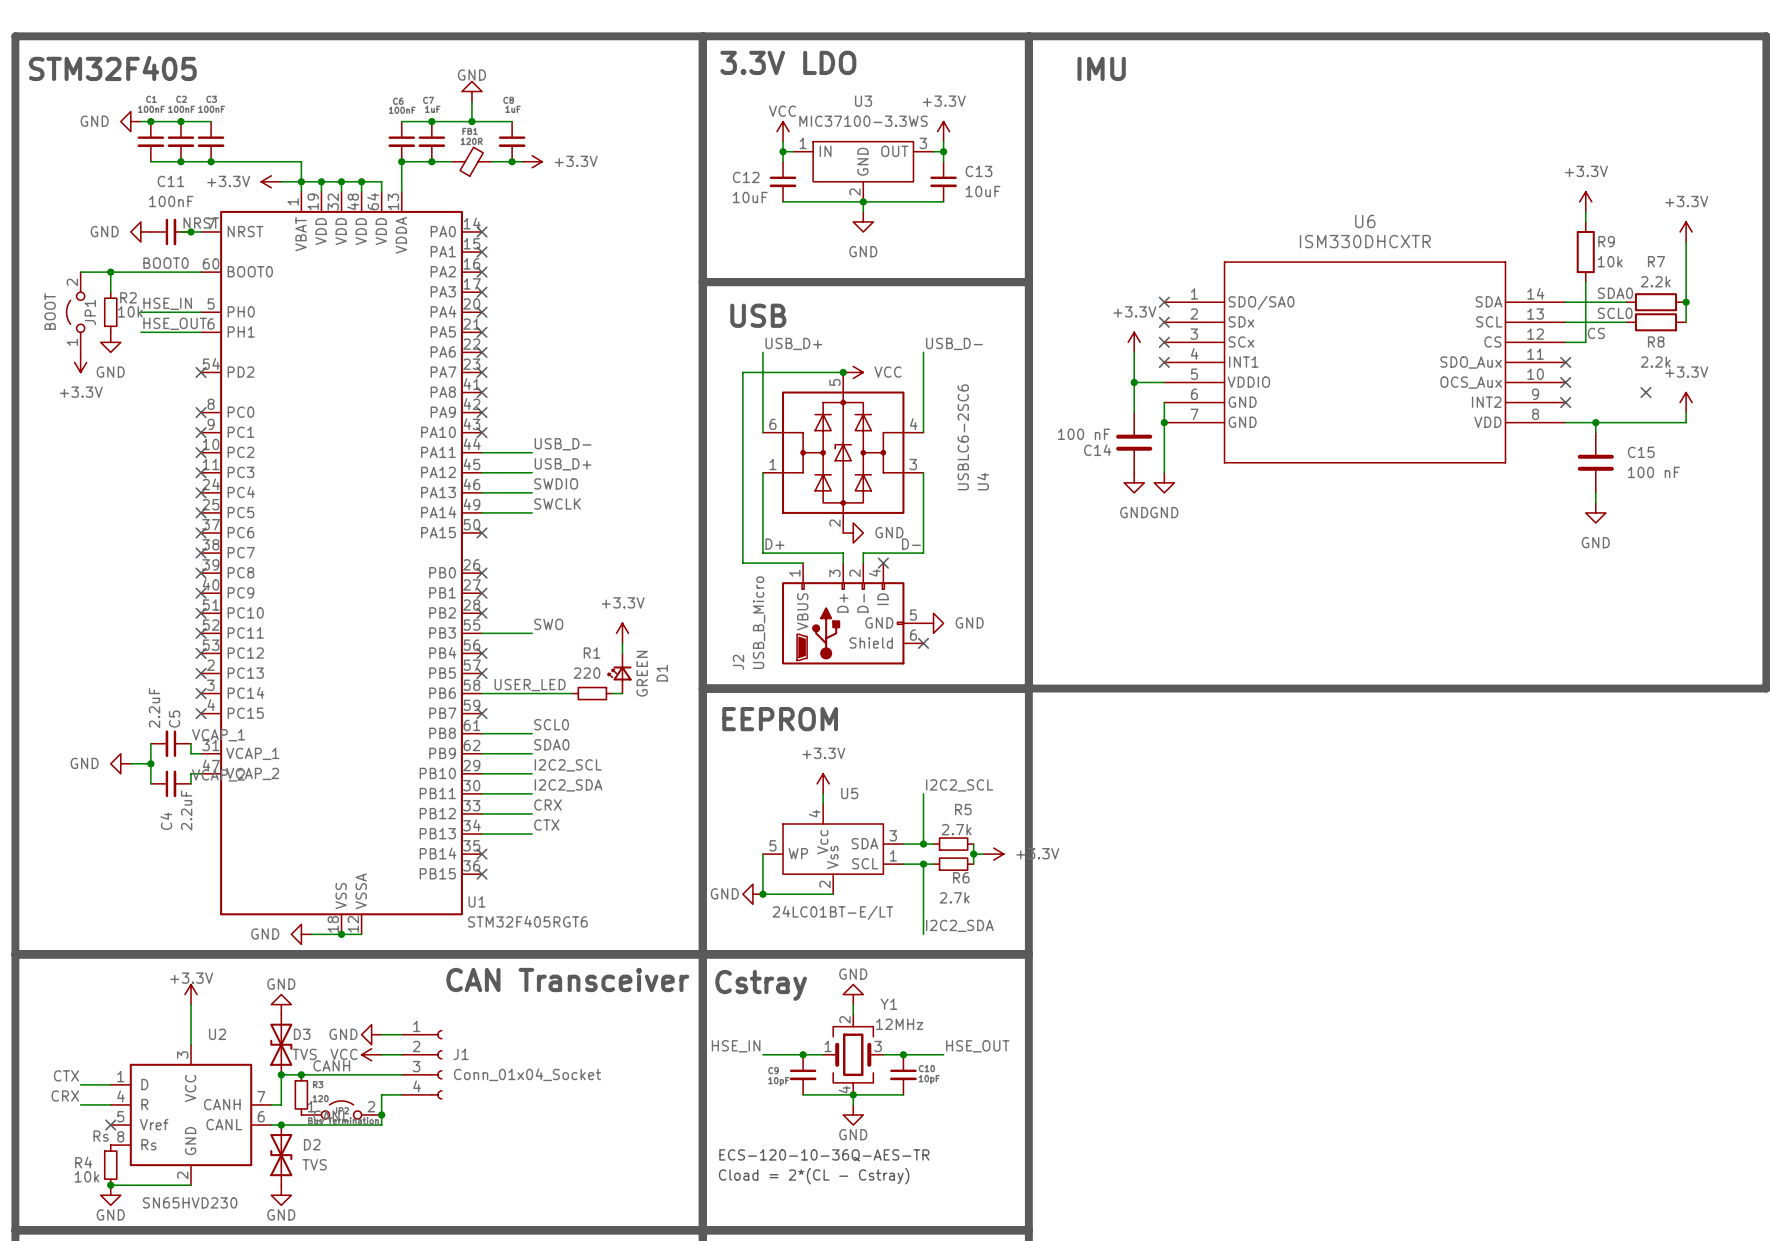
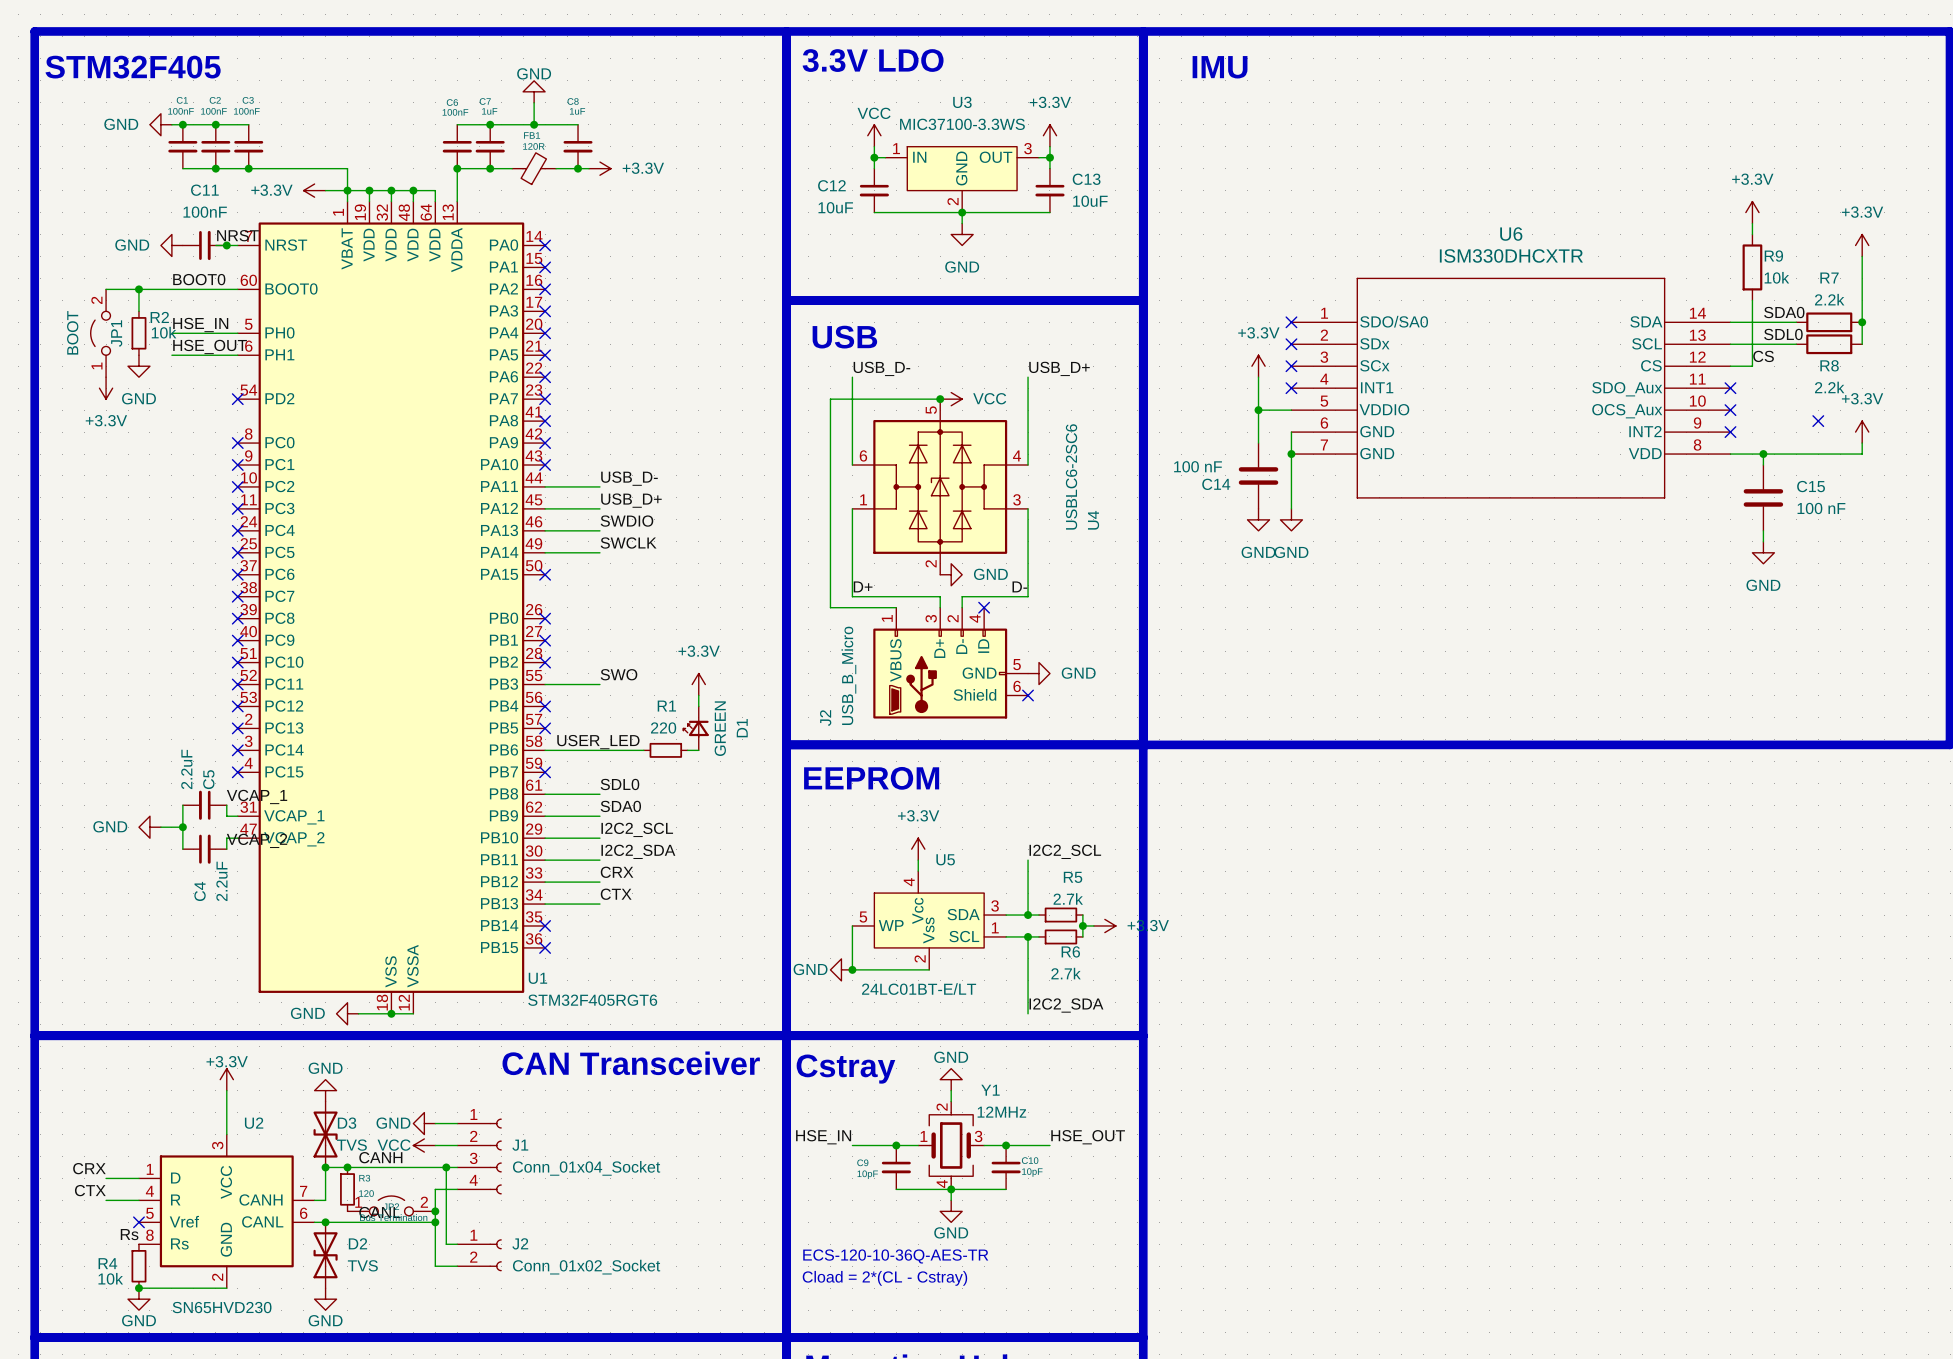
label: SCL0 (1615, 313) -> SDL0 (1783, 334)
label: USB_D+ (793, 343) -> USB_D- (881, 368)
label: USB_D- (954, 343) -> USB_D+ (1059, 368)
label: SCL0 (551, 724) -> SDL0 (619, 784)
wire: none -> (446, 1167) (446, 1244) (457, 1244)
junction: none -> (446, 1167)
label: CTX (66, 1075) -> CRX (89, 1168)
label: CRX (65, 1095) -> CTX (90, 1190)
wire: none -> (435, 1222) (435, 1266) (457, 1266)
junction: none -> (435, 1222)
J2: none -> Conn_01x02_Socket (479, 1255)

